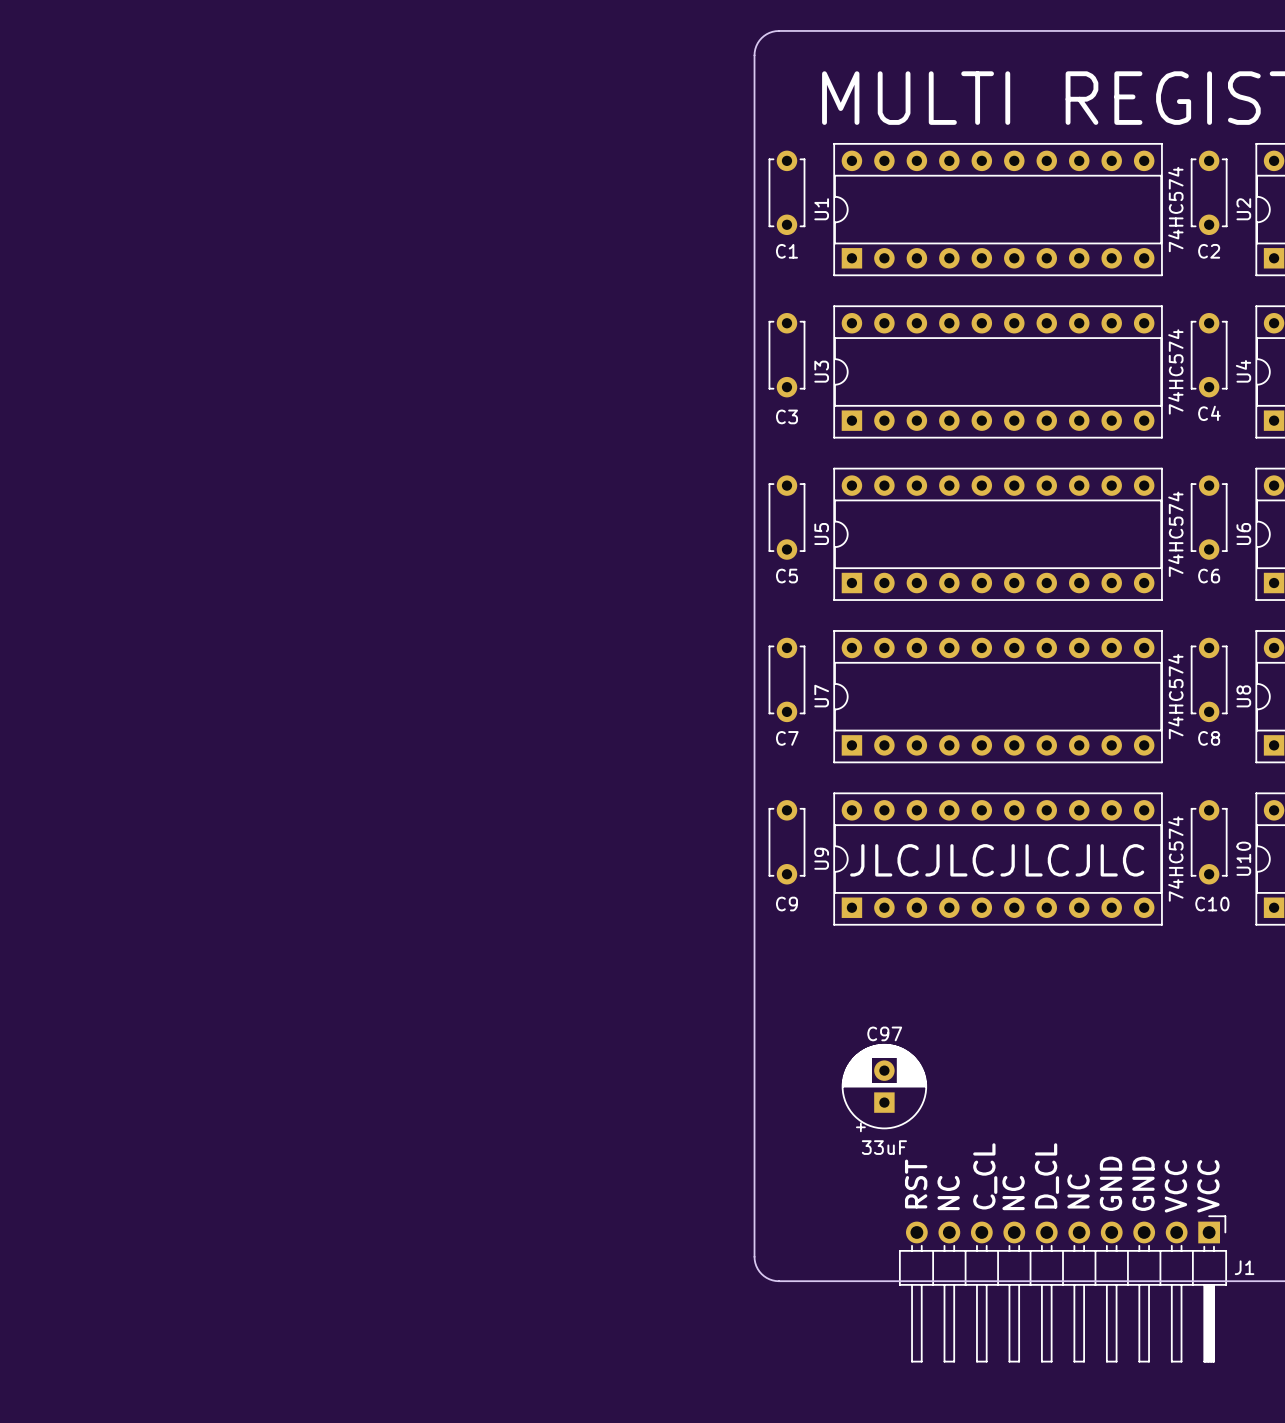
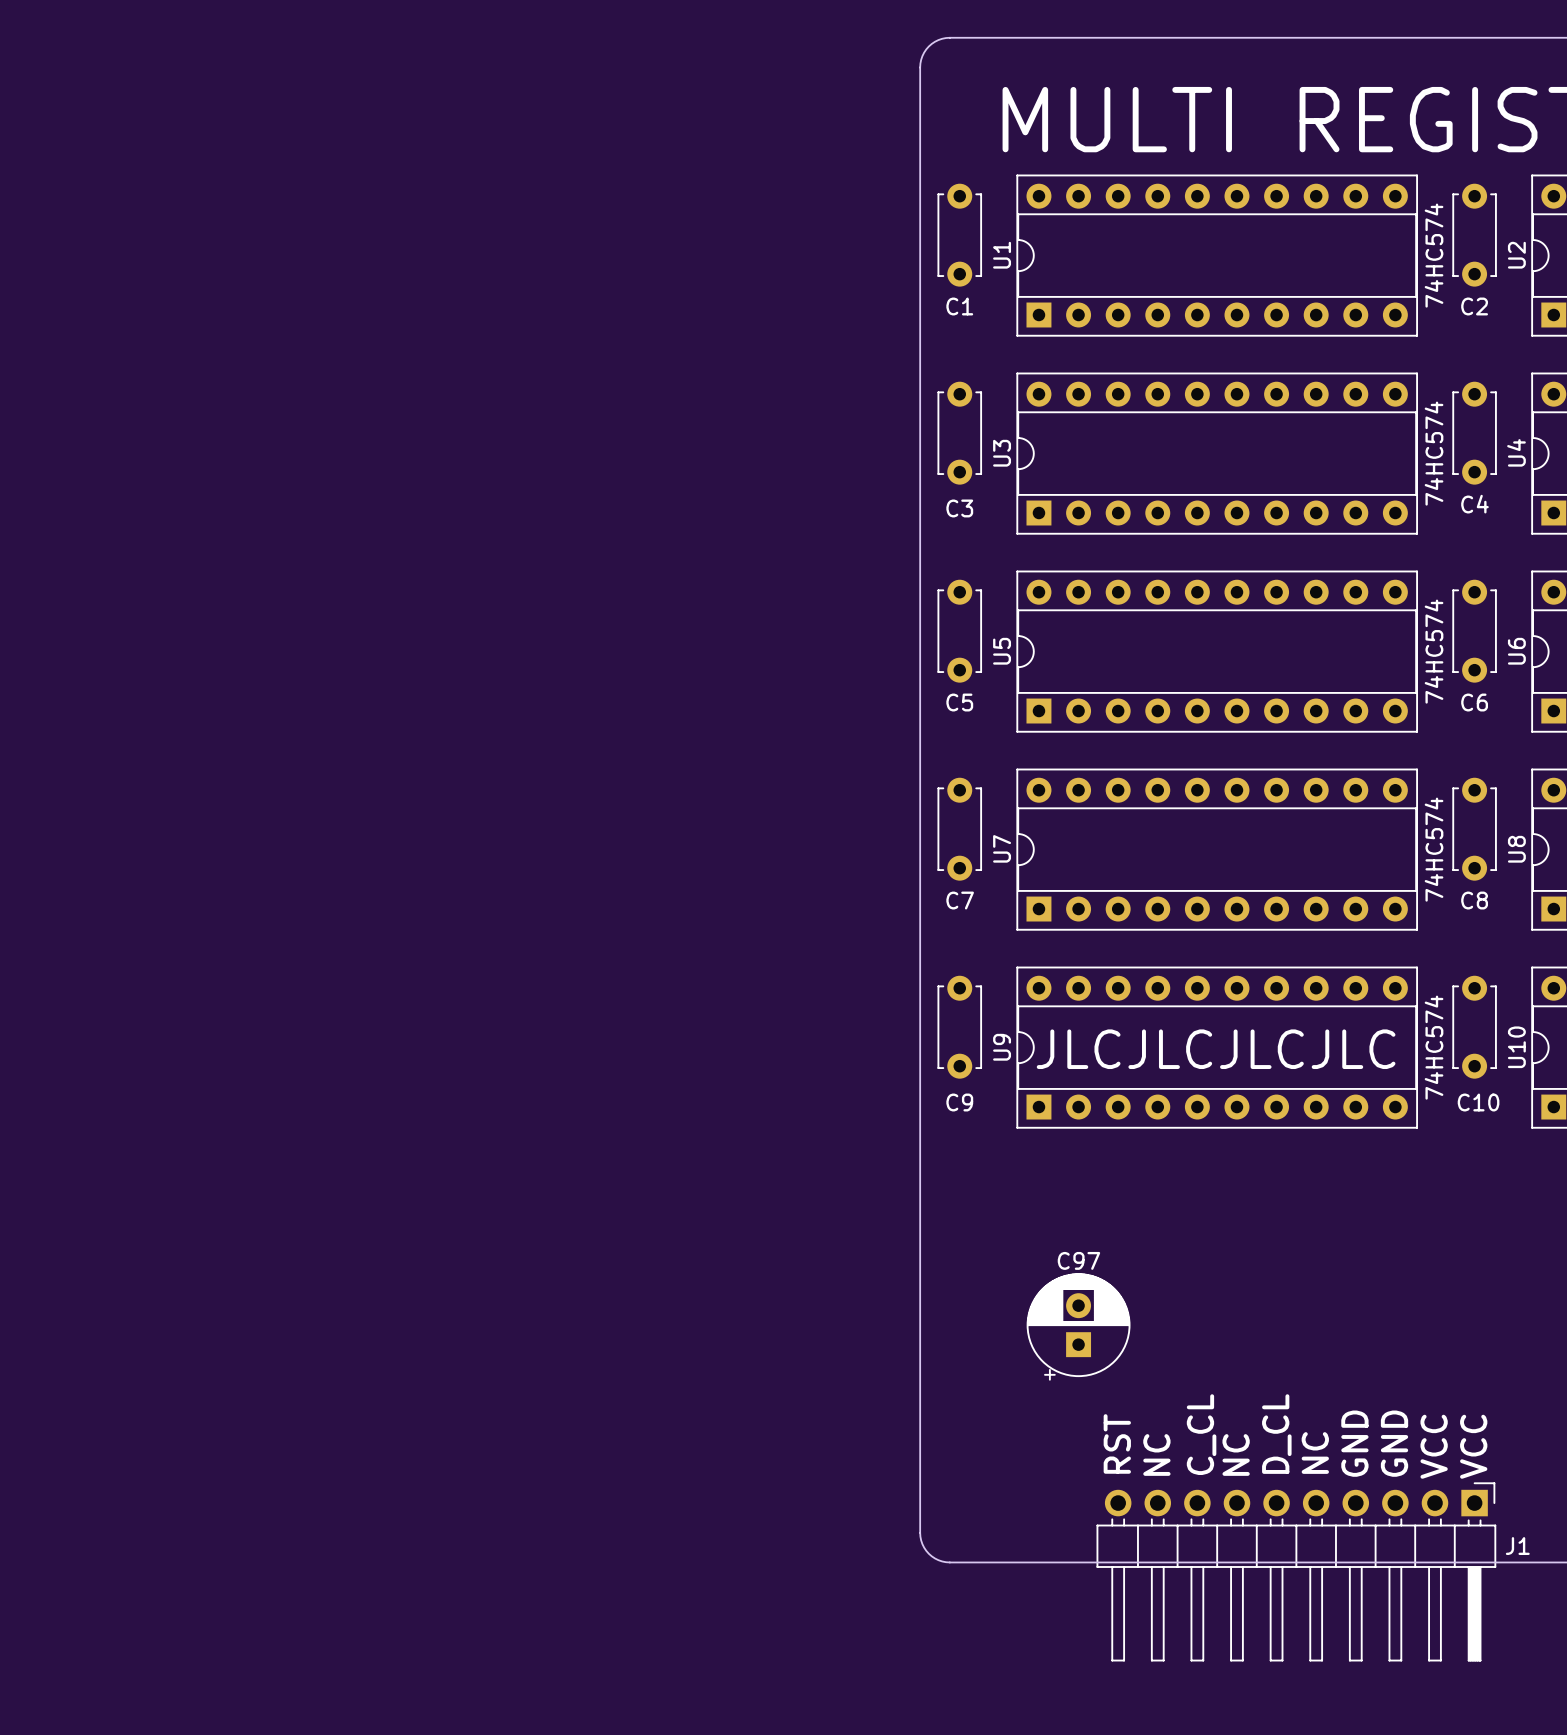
C97 value: 33uF (884, 1147) -> none

